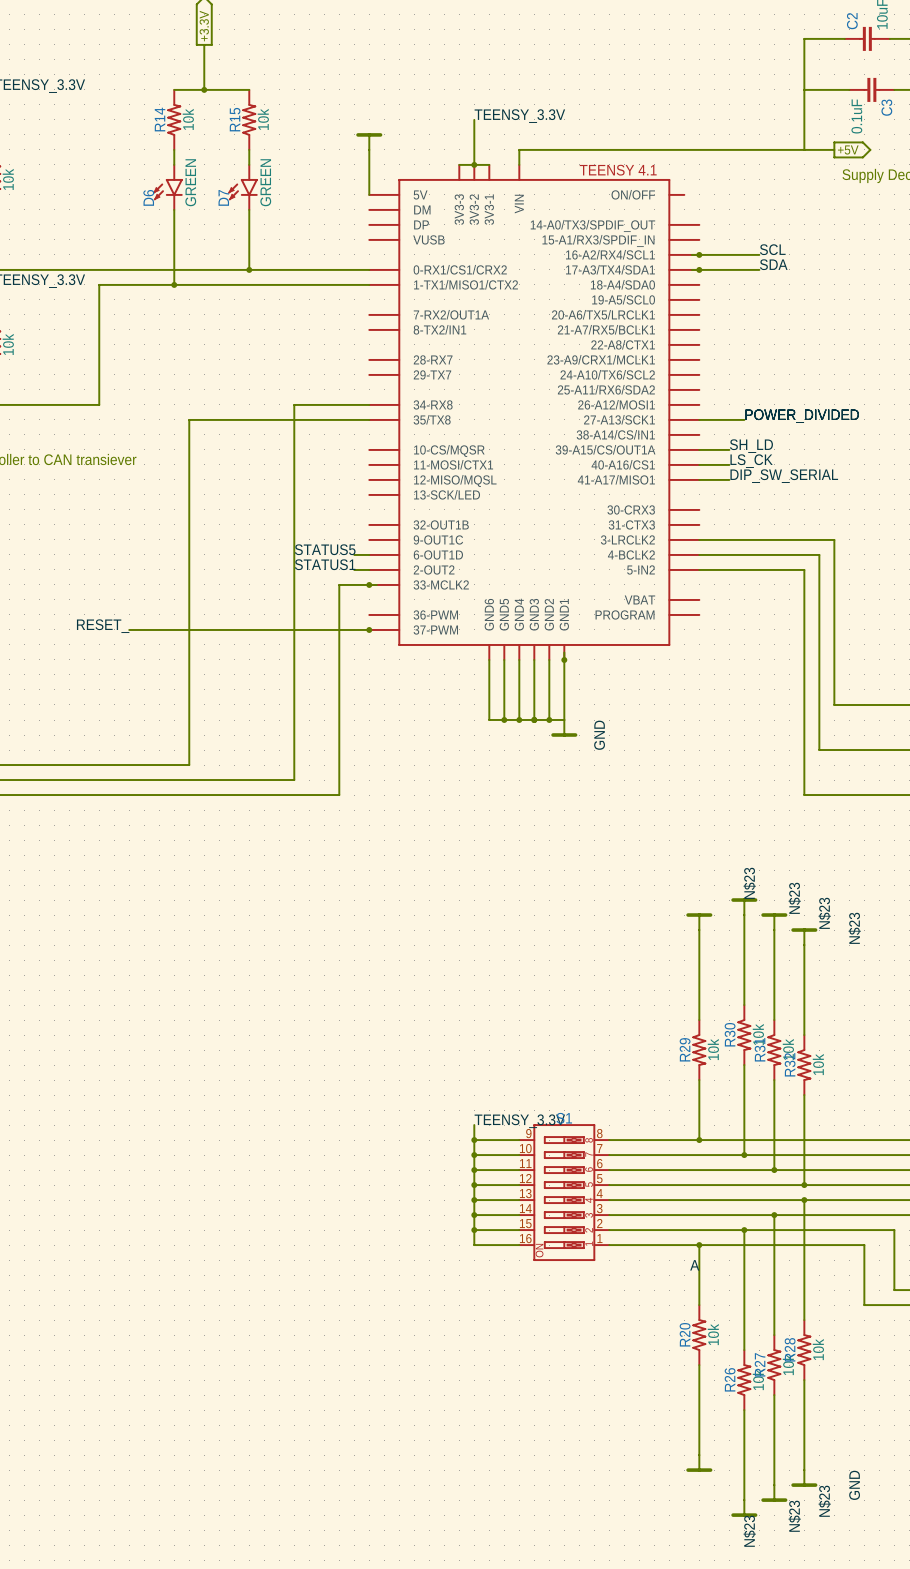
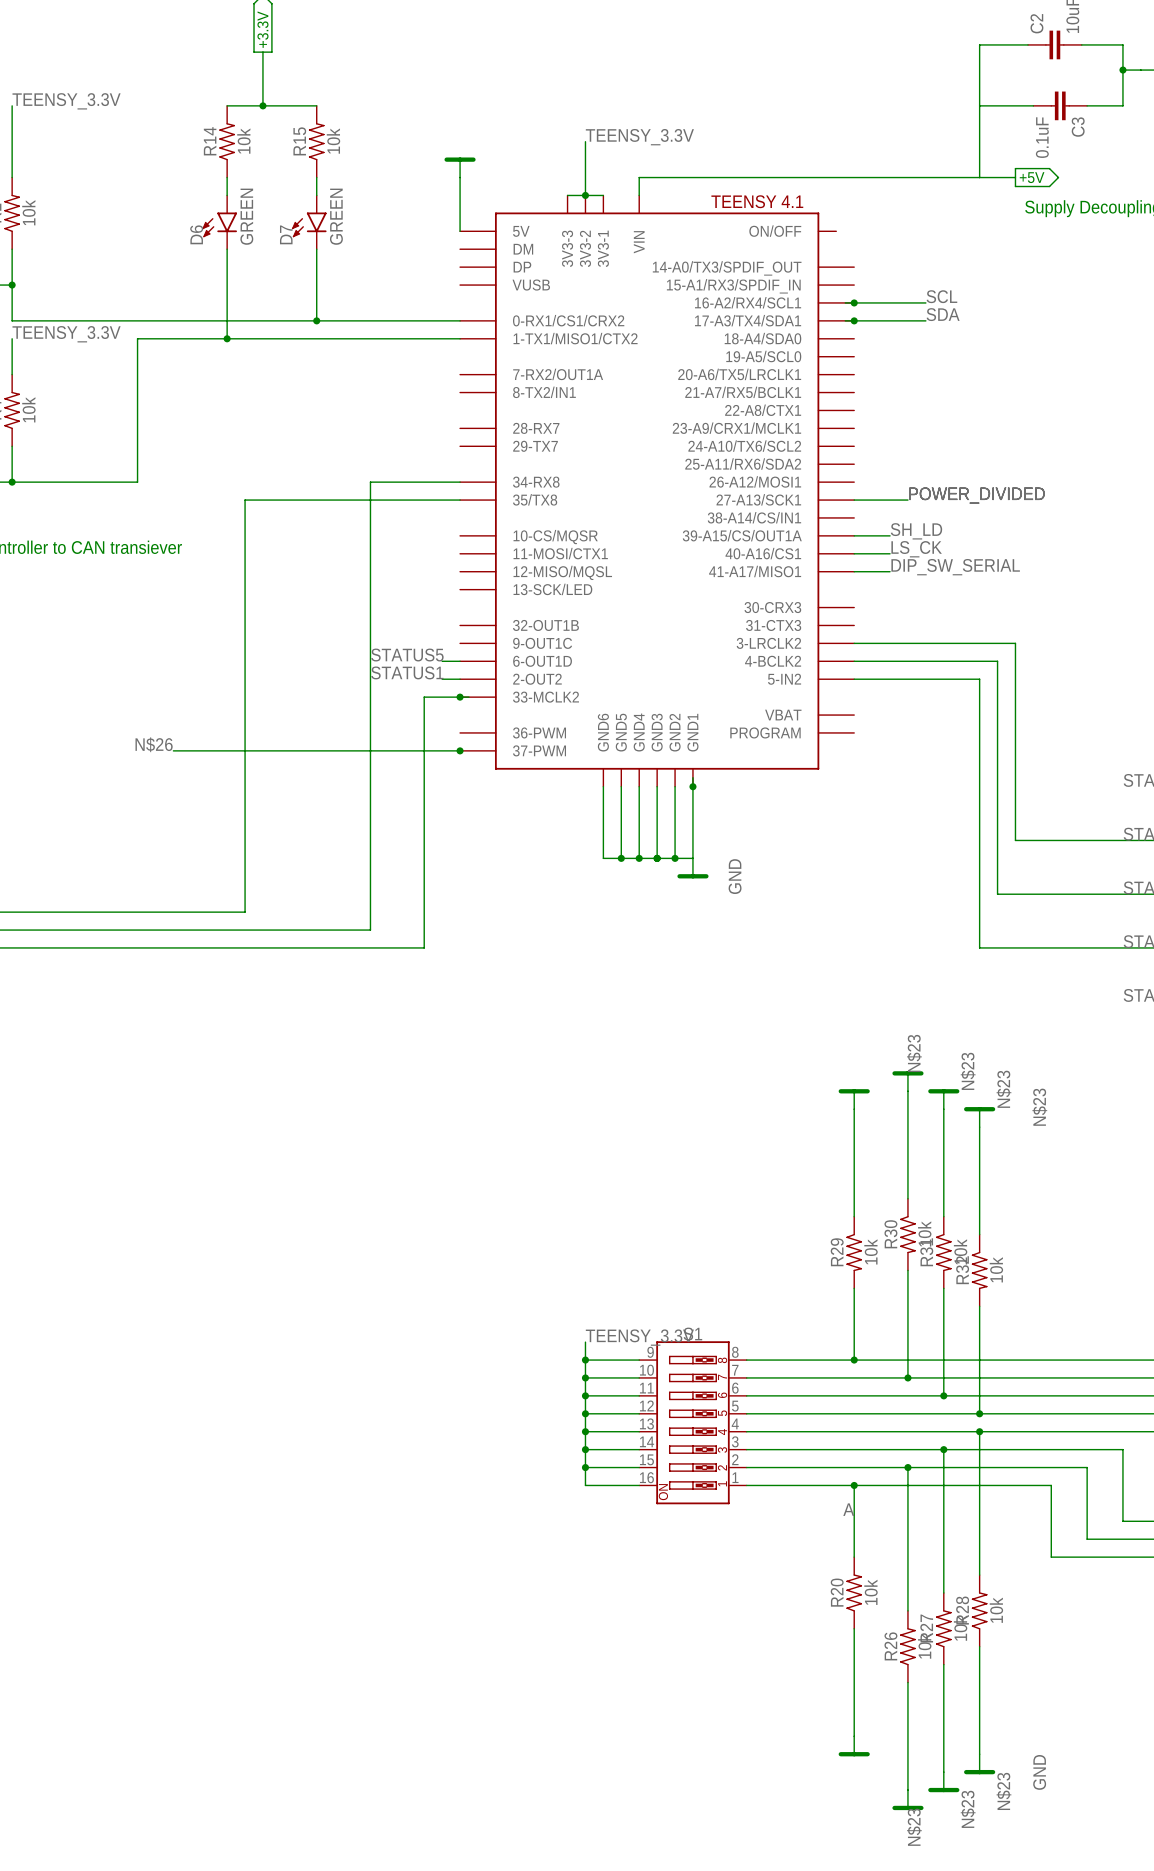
label: RESET_ (103, 626) -> N$26 (154, 744)

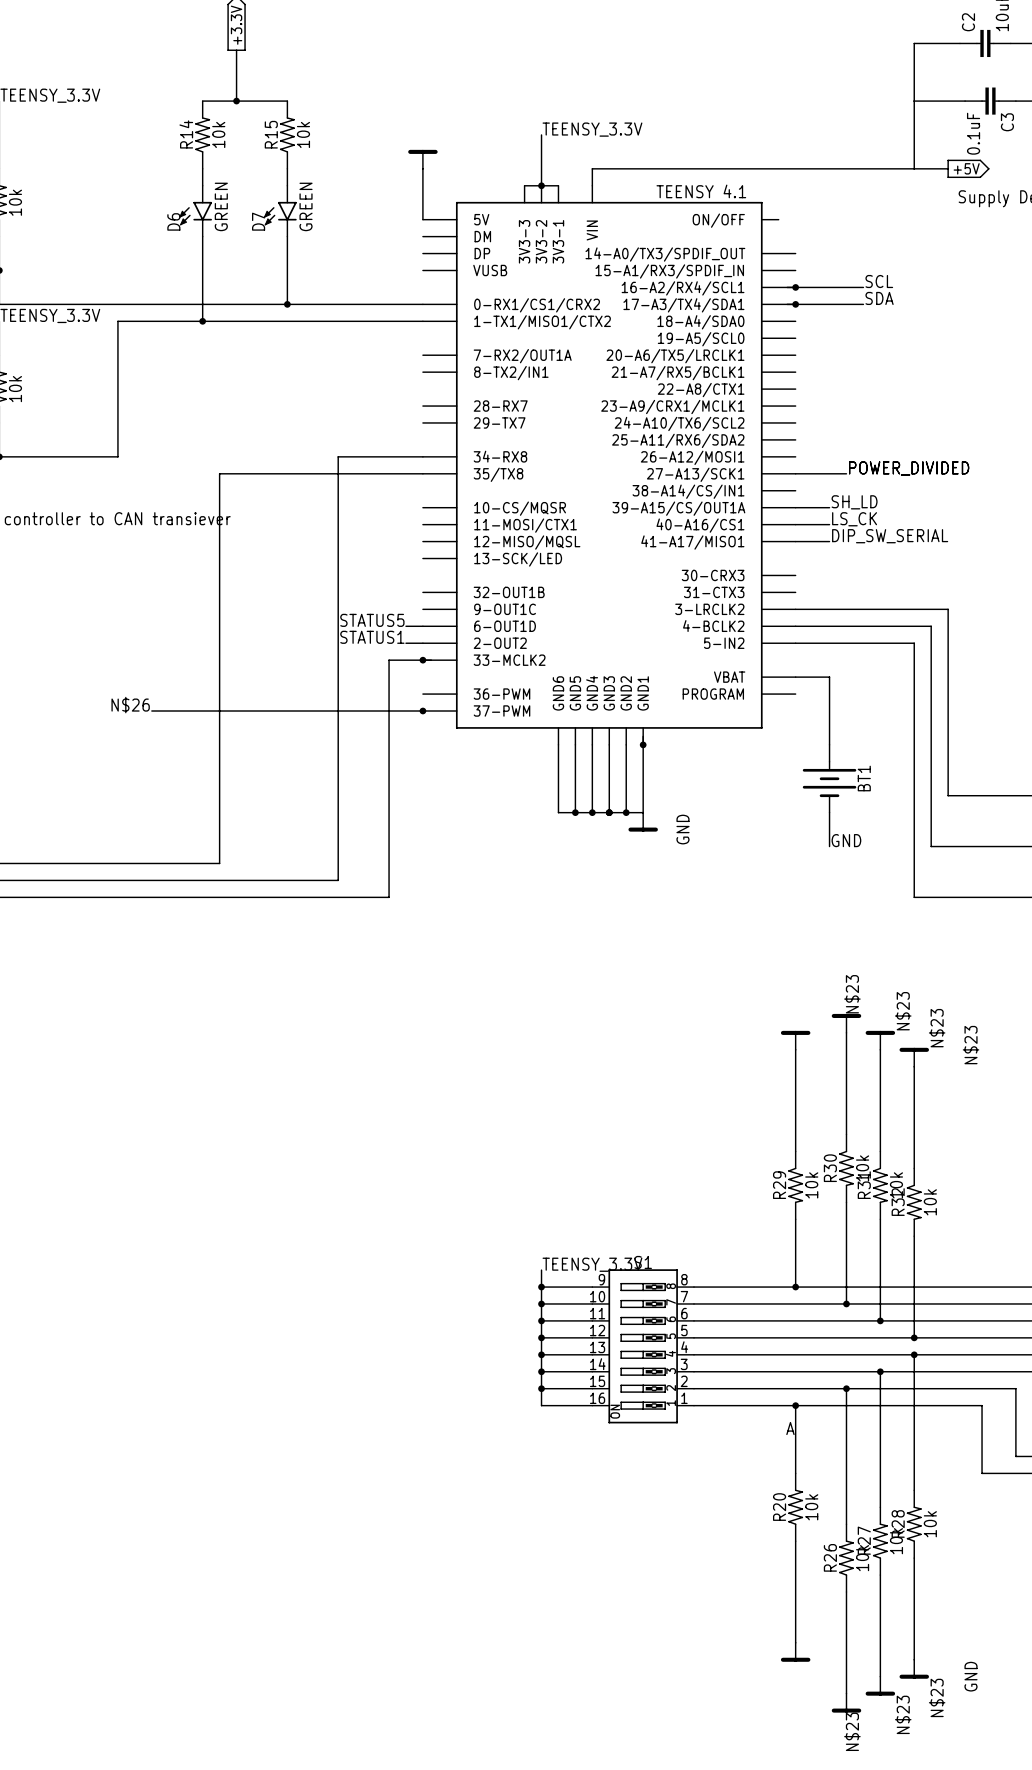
wire: none -> (795, 677) (829, 677) (829, 744)
BT1: none -> (829, 778)
wire: none -> (829, 812) (829, 846)
label: none -> GND (846, 840)

